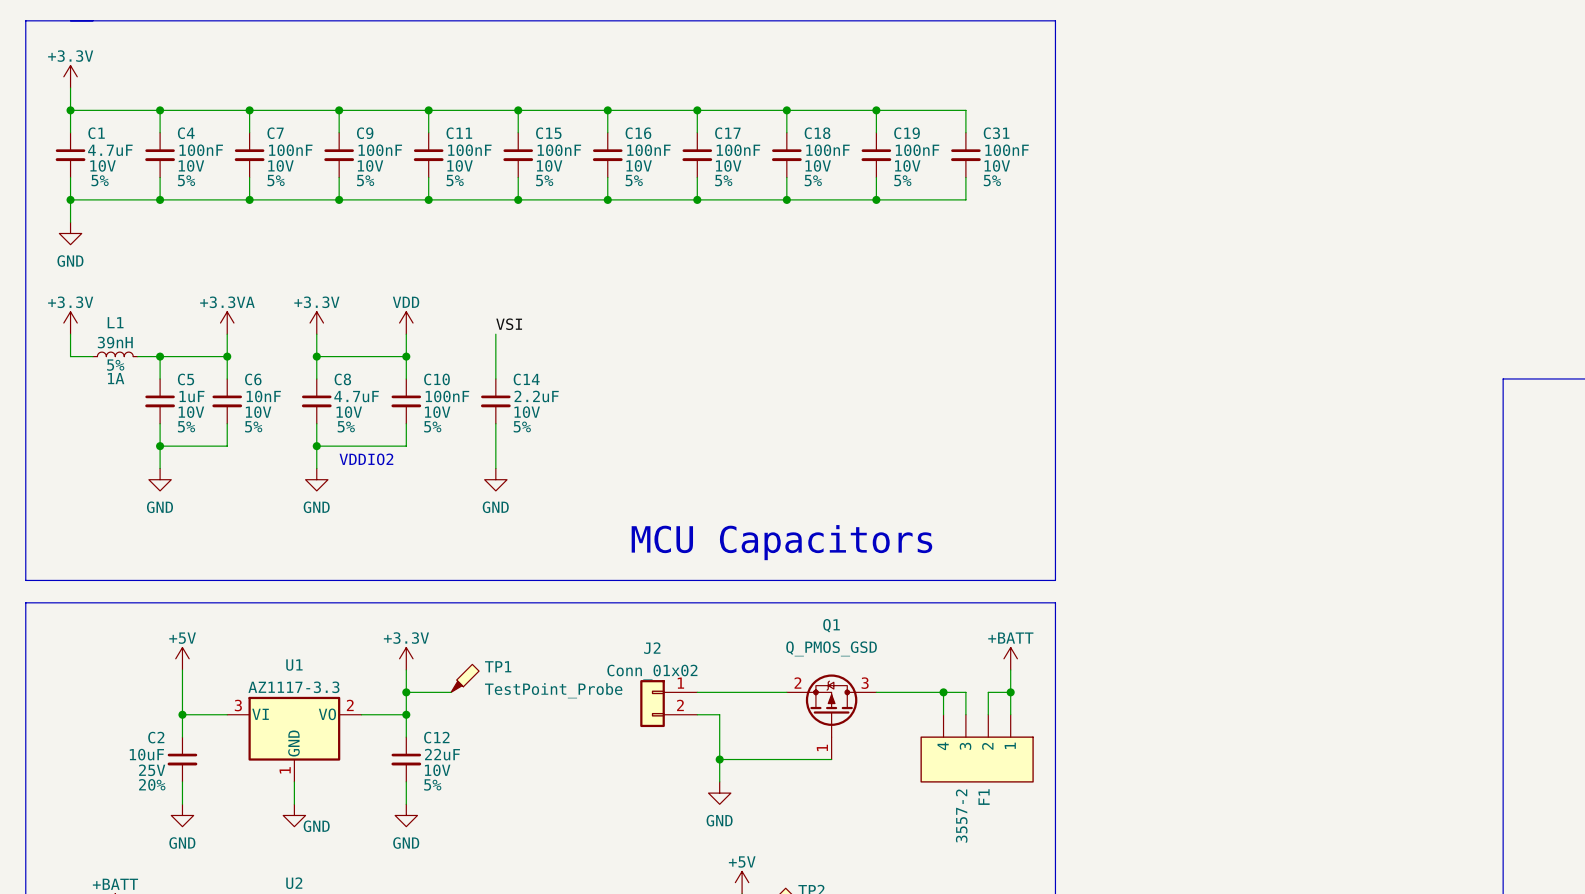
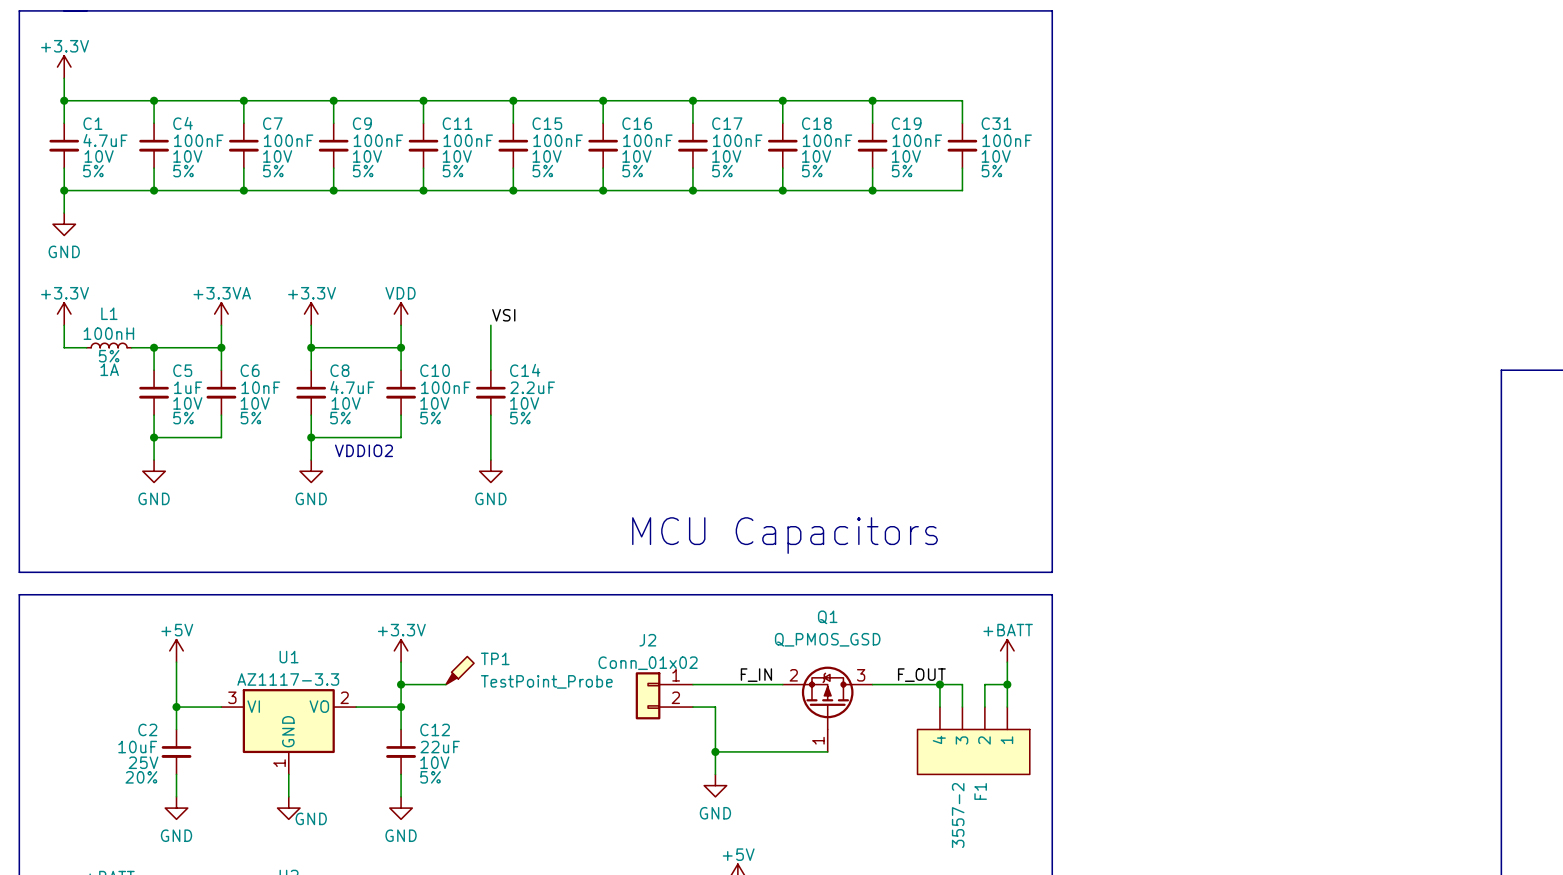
L1 value: 39nH (115, 342) -> 100nH (108, 333)
label: none -> F_IN (756, 675)
label: none -> F_OUT (921, 675)

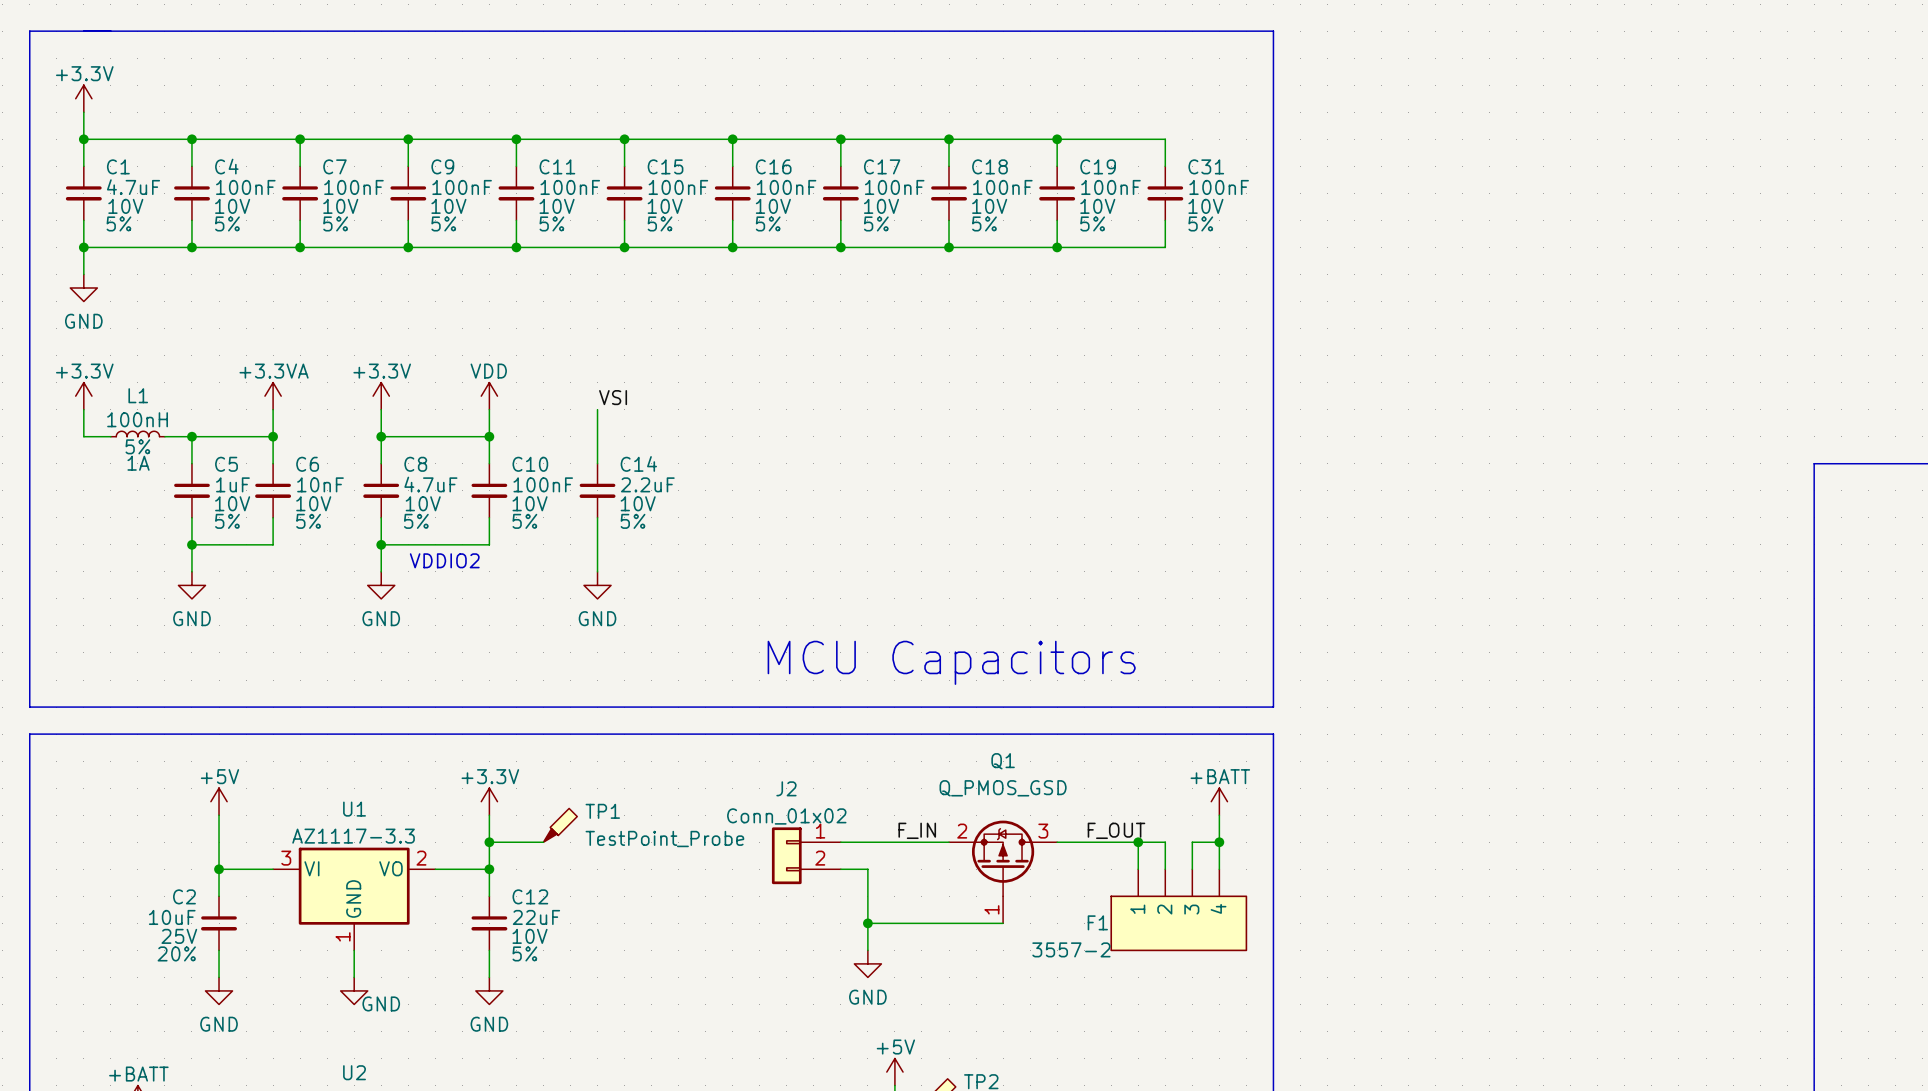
F1 flip: as is (973, 751) -> left-right (1178, 923)
F1 name position: F1 (980, 791) -> F1 (1097, 922)
F1 value position: 3557-2 (958, 815) -> 3557-2 (1071, 949)

